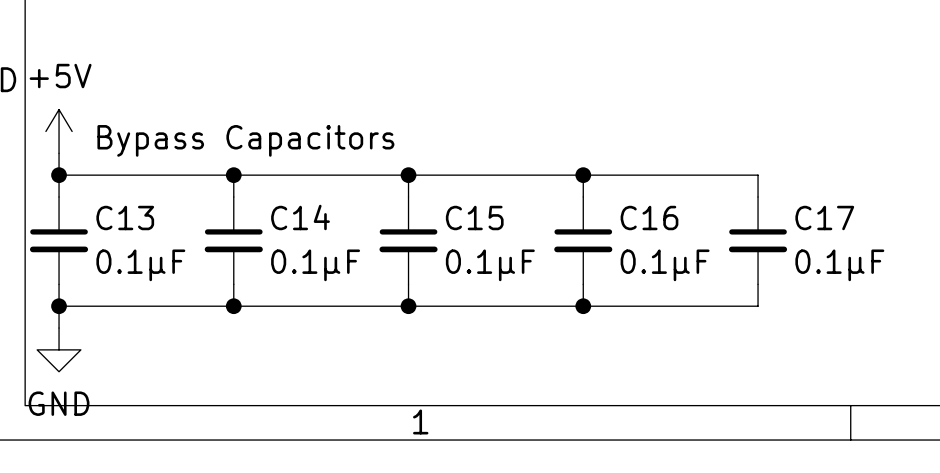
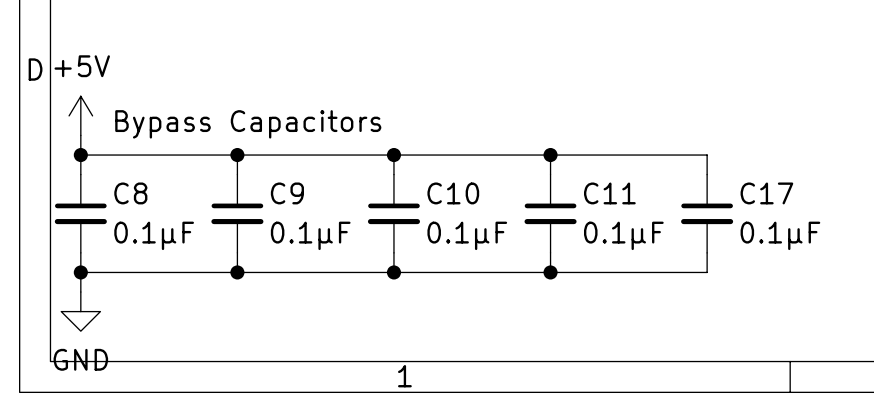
C14 name: C14 (300, 217) -> C9 (287, 193)
C13 name: C13 (125, 218) -> C8 (130, 193)
C15 name: C15 (474, 218) -> C10 (453, 193)
C16 name: C16 (649, 218) -> C11 (609, 193)

